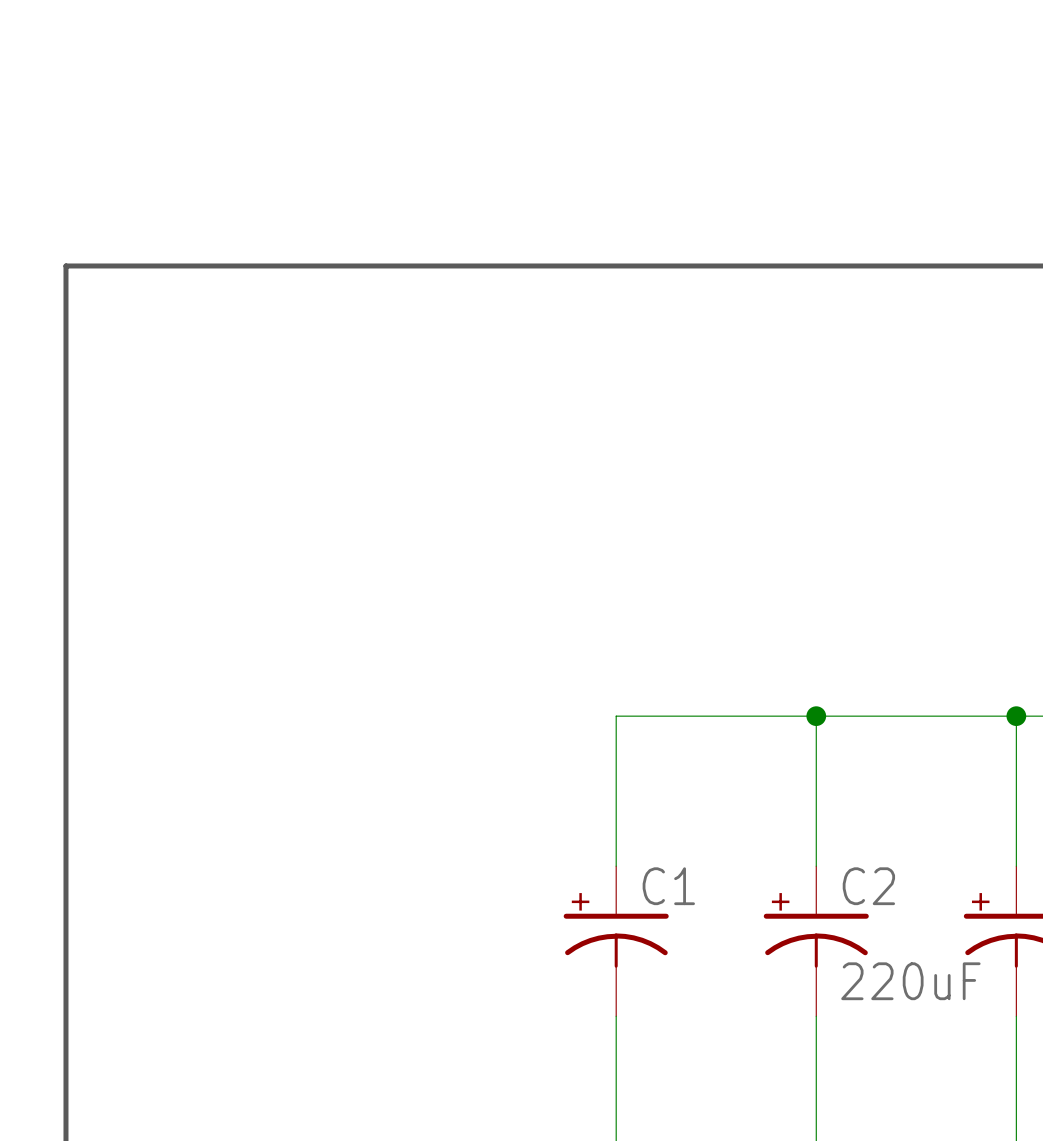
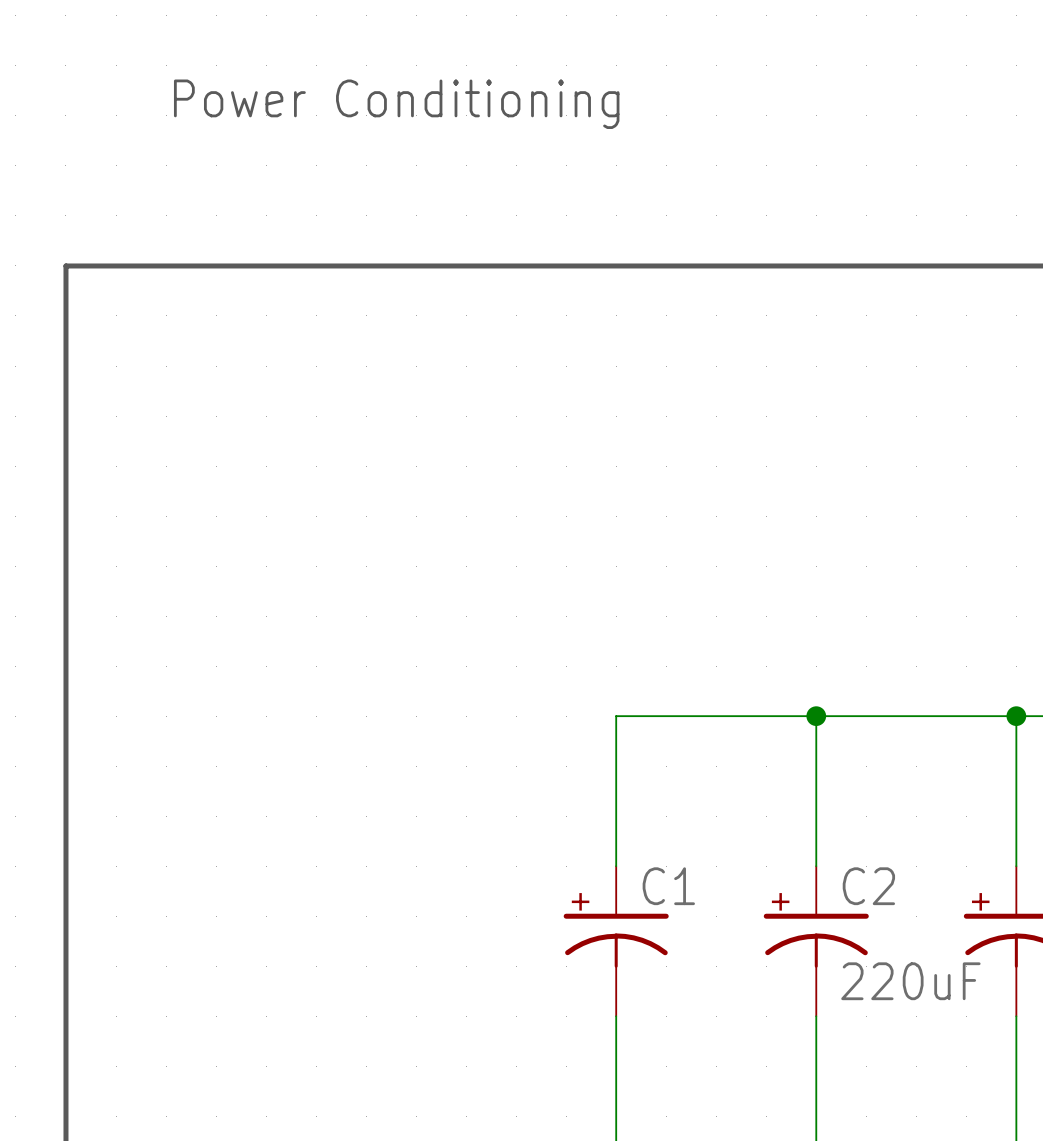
text: none -> Power Conditioning (396, 104)

